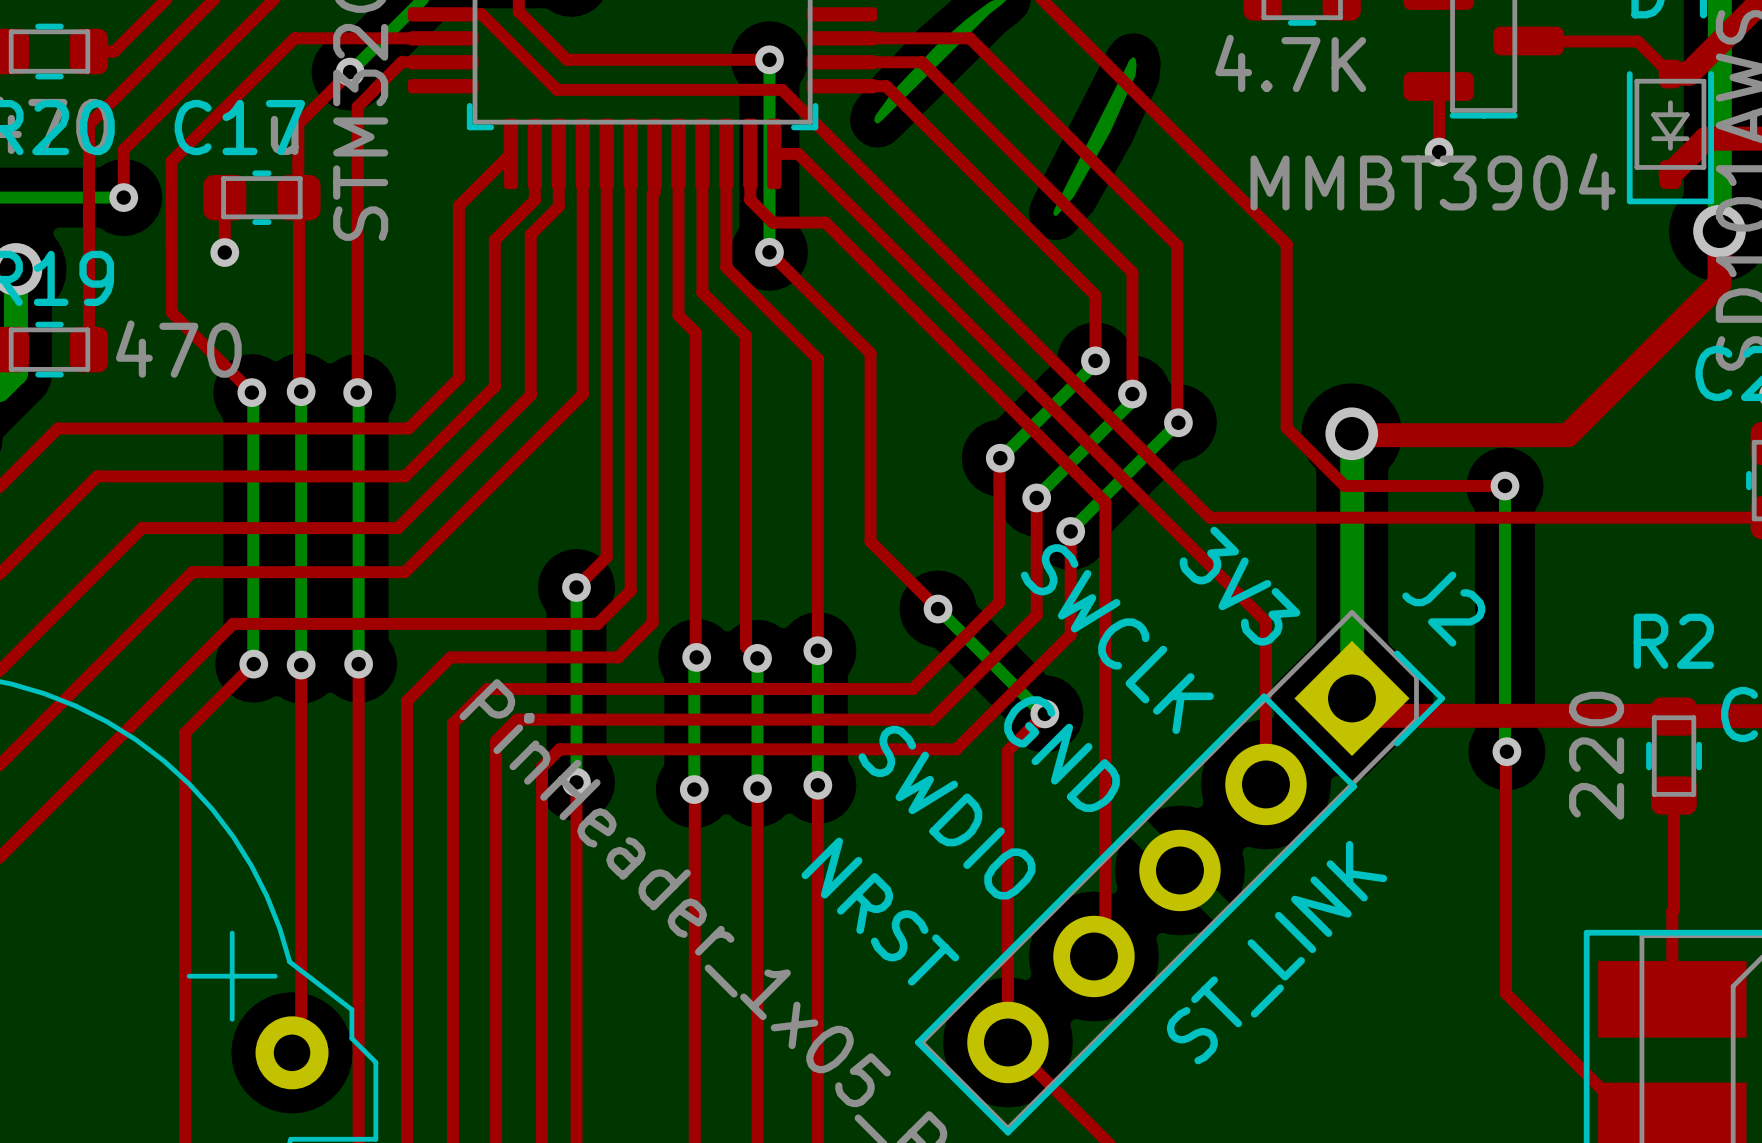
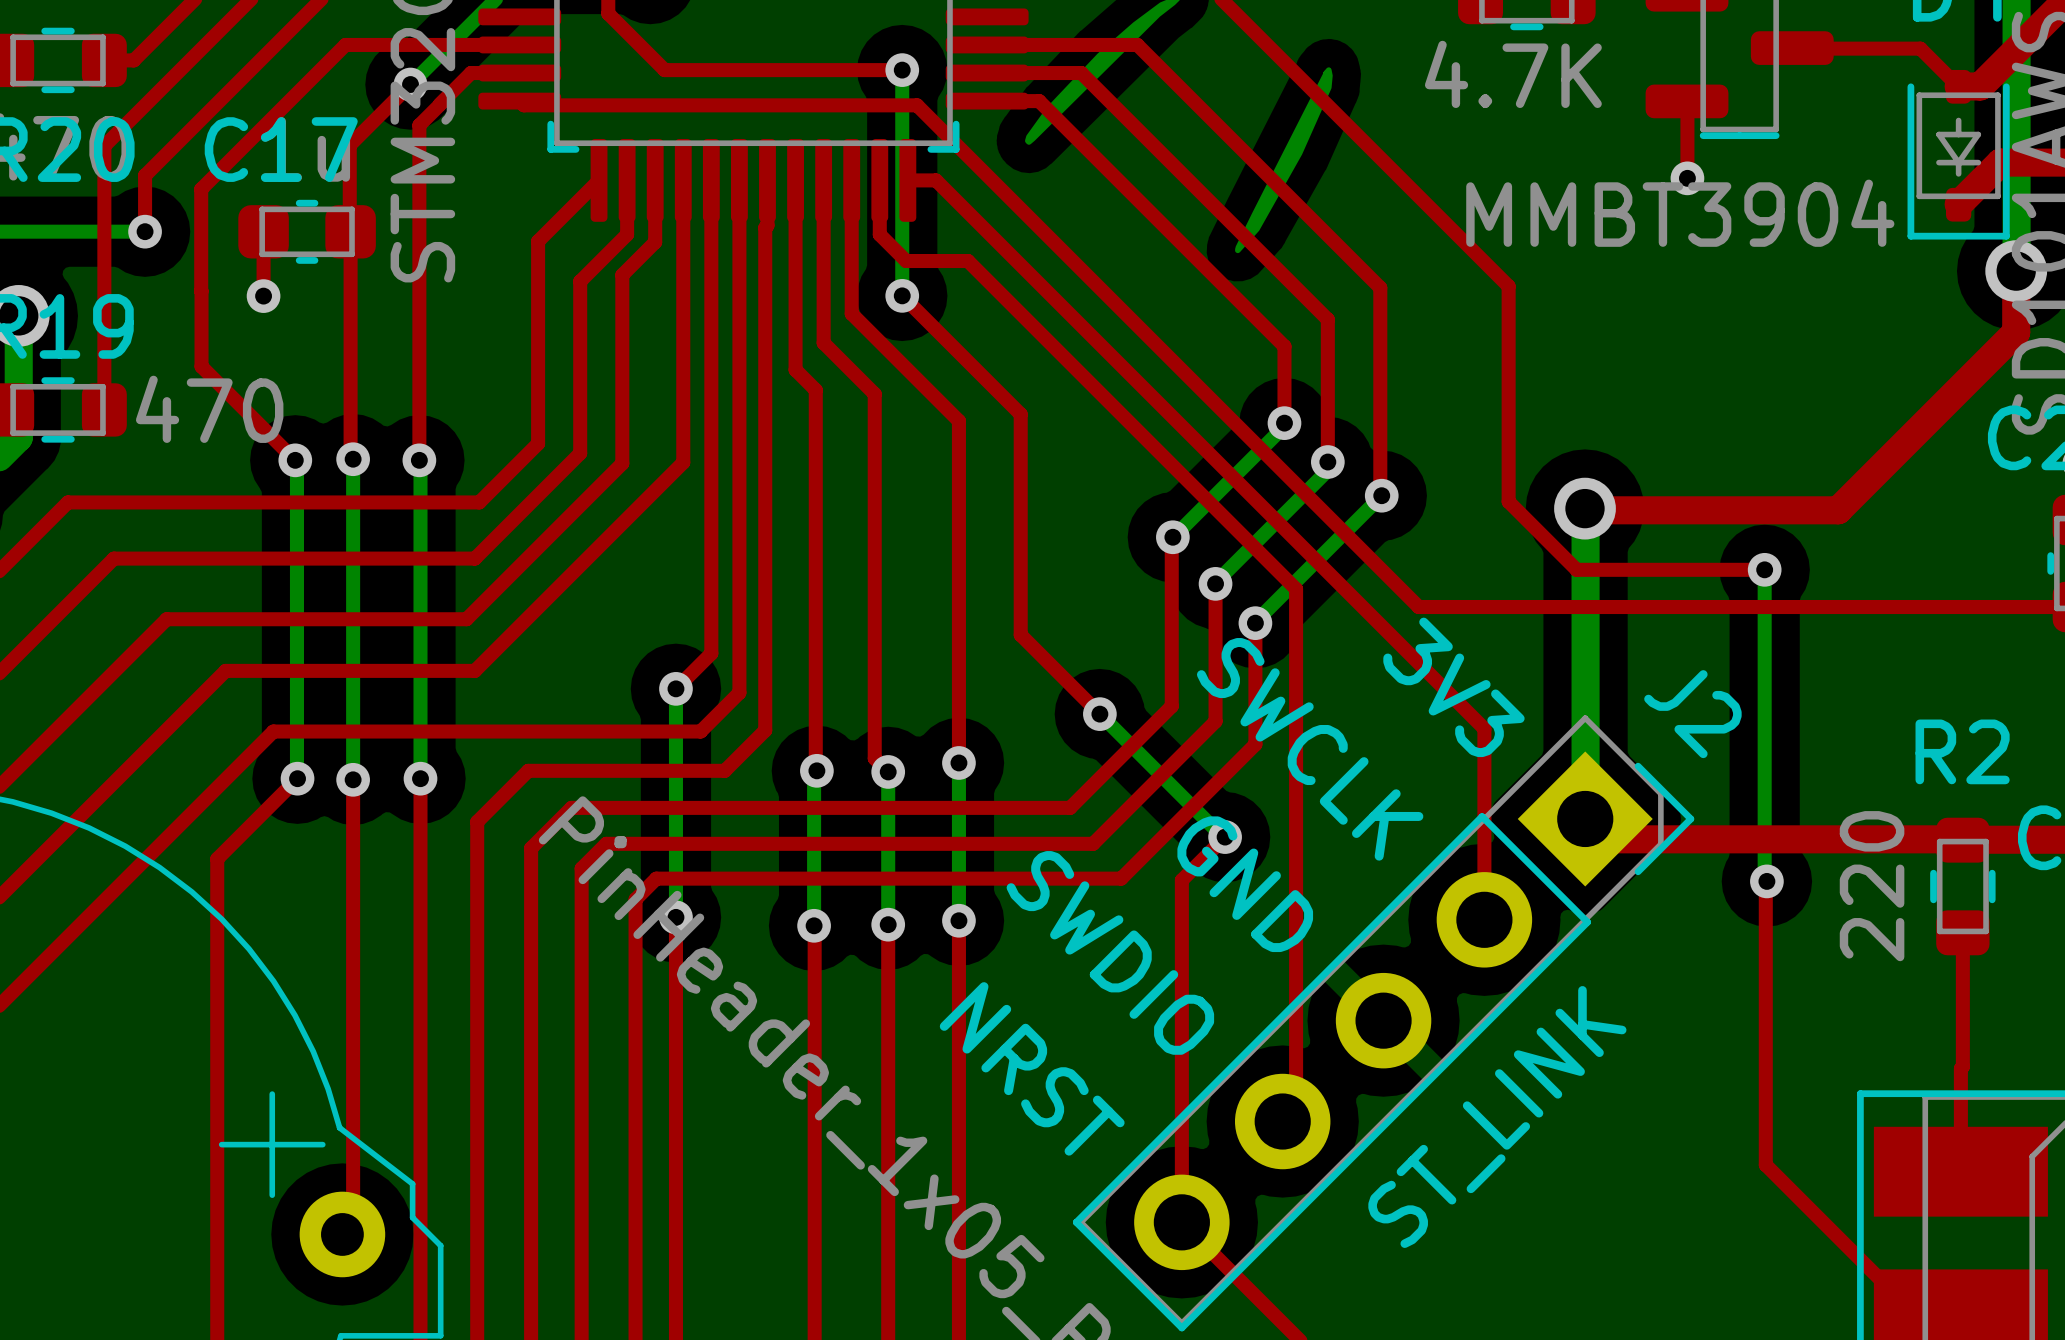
top track: (443, 14) (481, 14) (557, 89) -> (519, 101) (523, 105) (653, 105)

